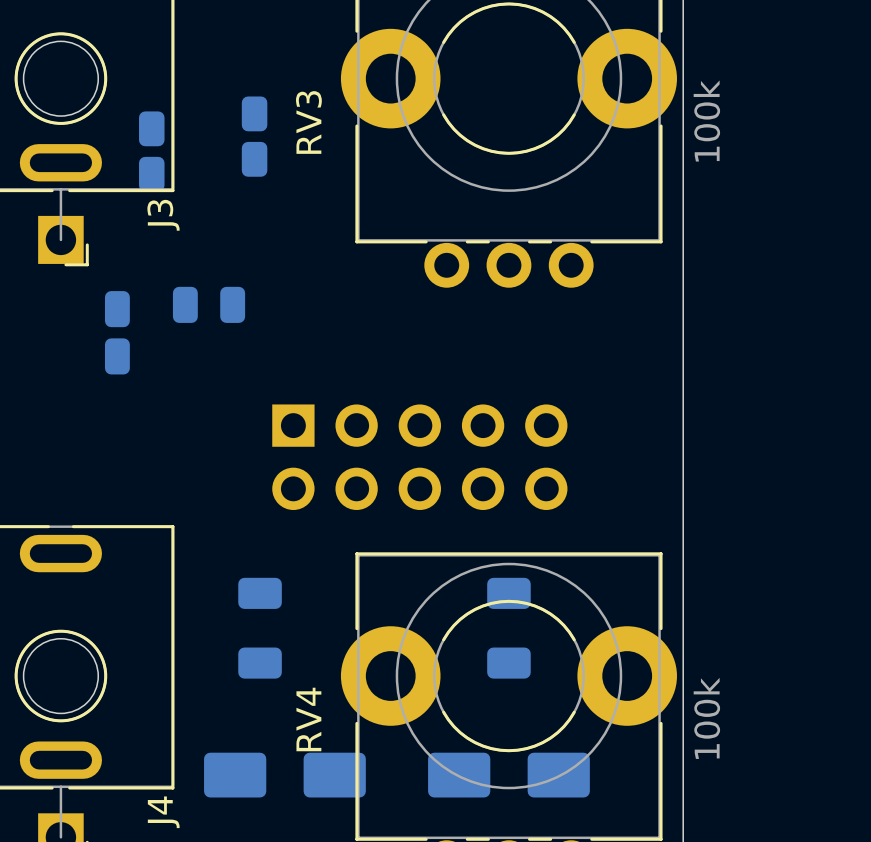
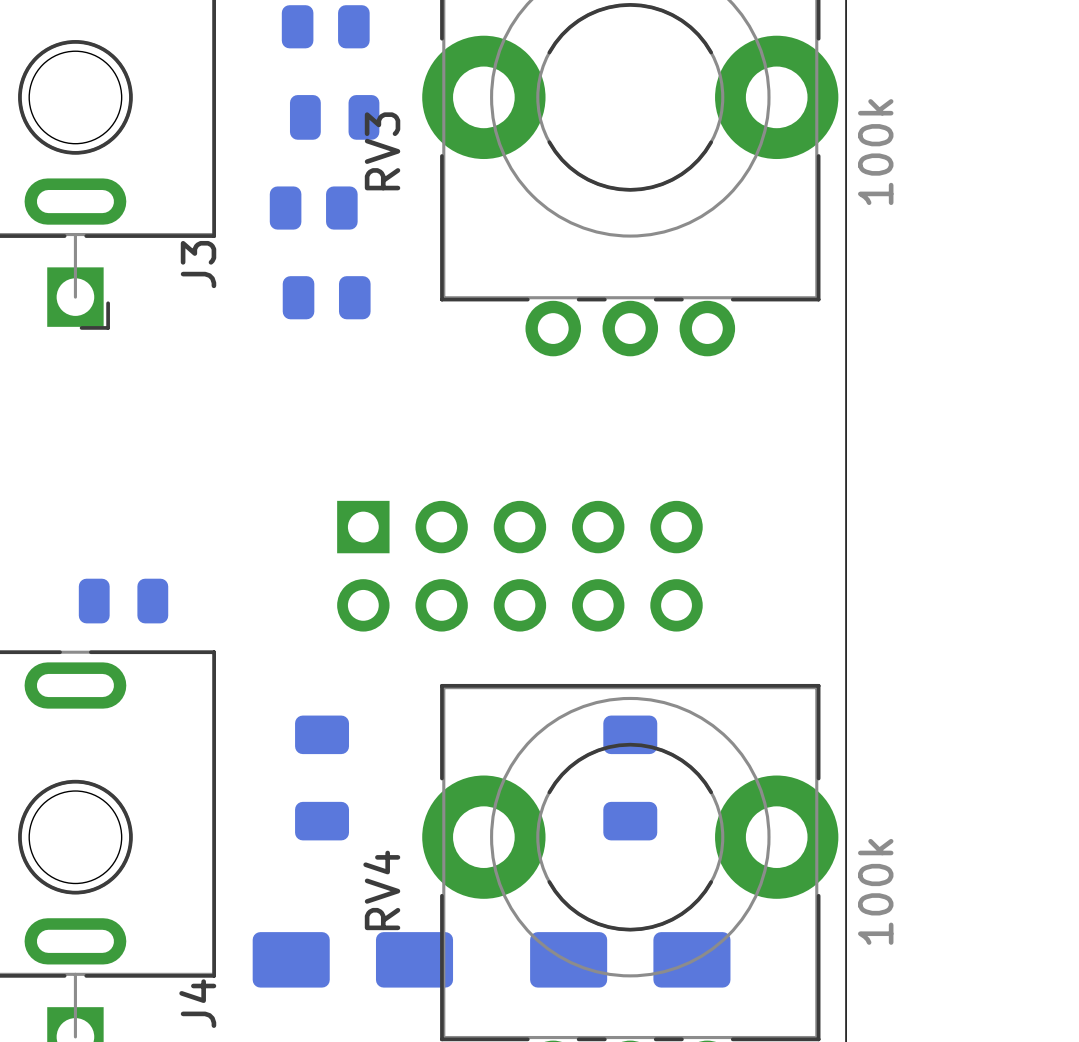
part: none -> (325, 26)
part: none -> (334, 117)
part: (254, 136) -> none
part: (151, 151) -> none
part: none -> (313, 208)
part: none -> (326, 297)
part: (209, 304) -> none
part: (117, 332) -> none
part: none -> (123, 601)

